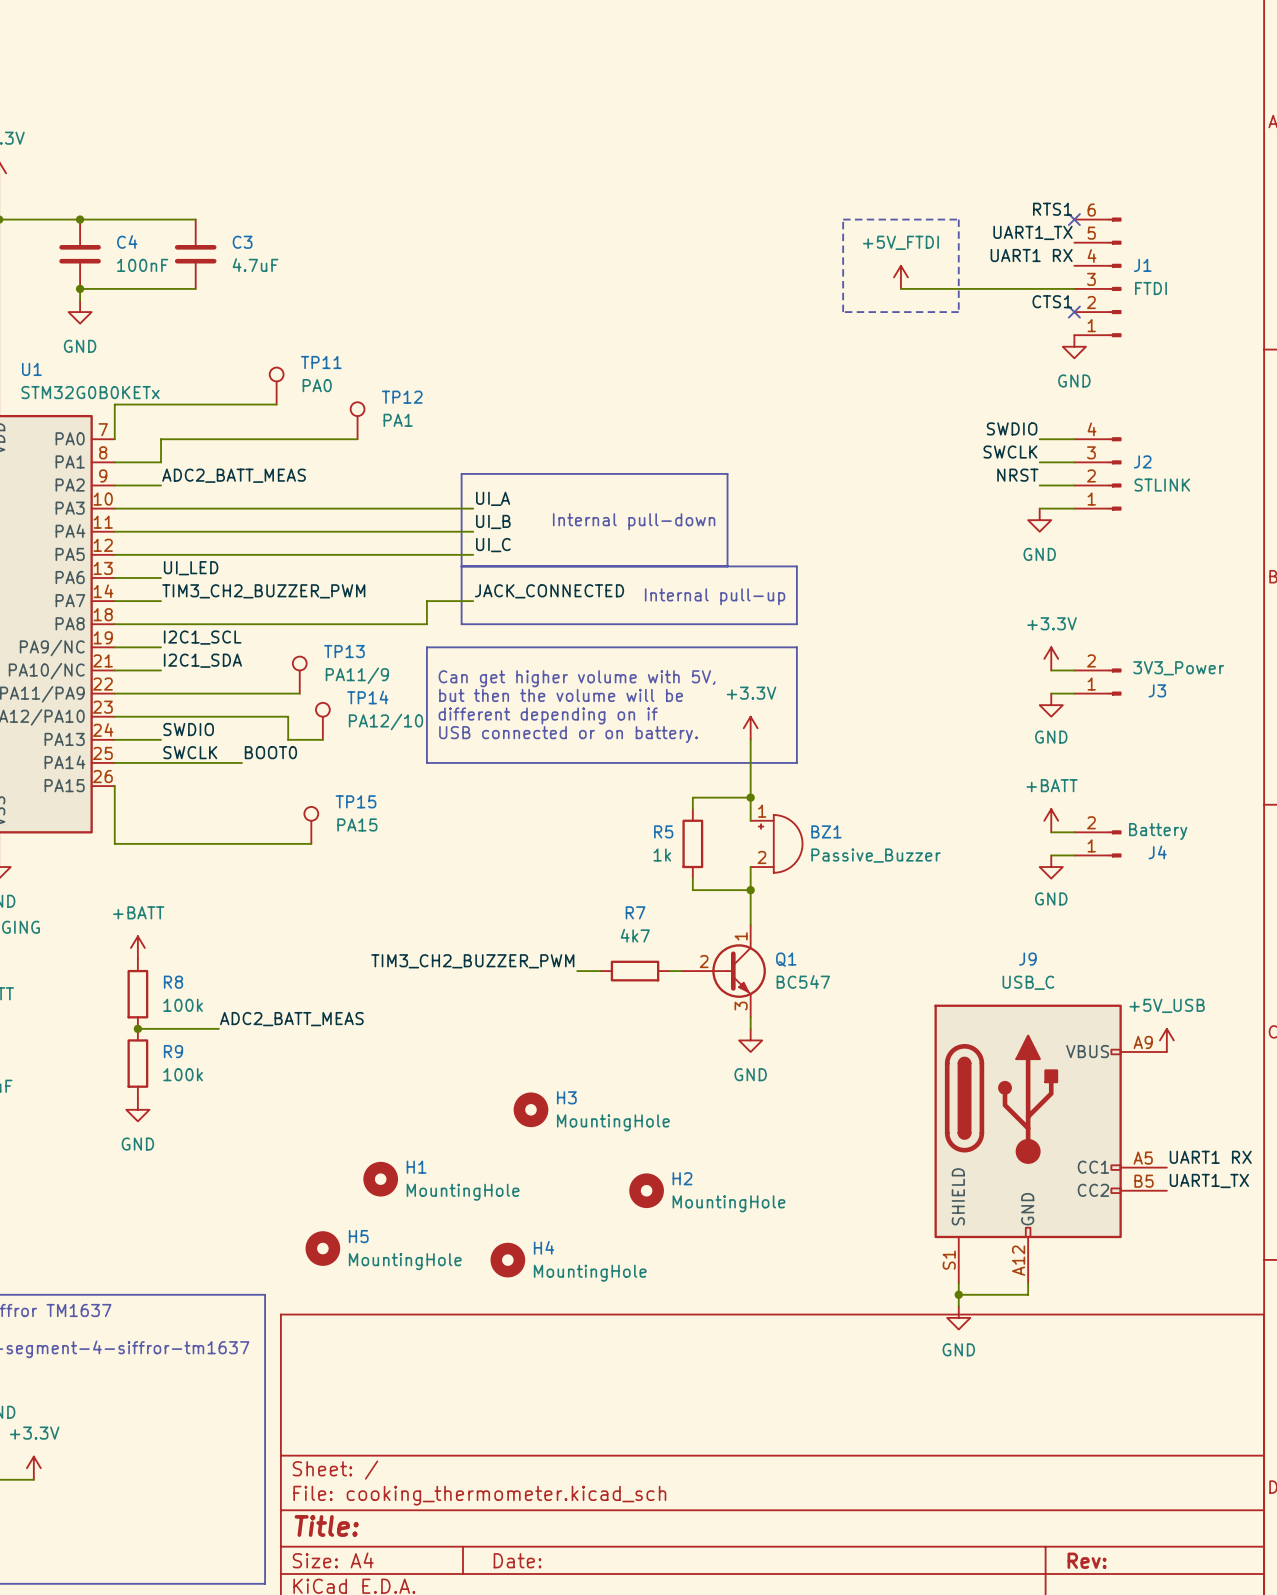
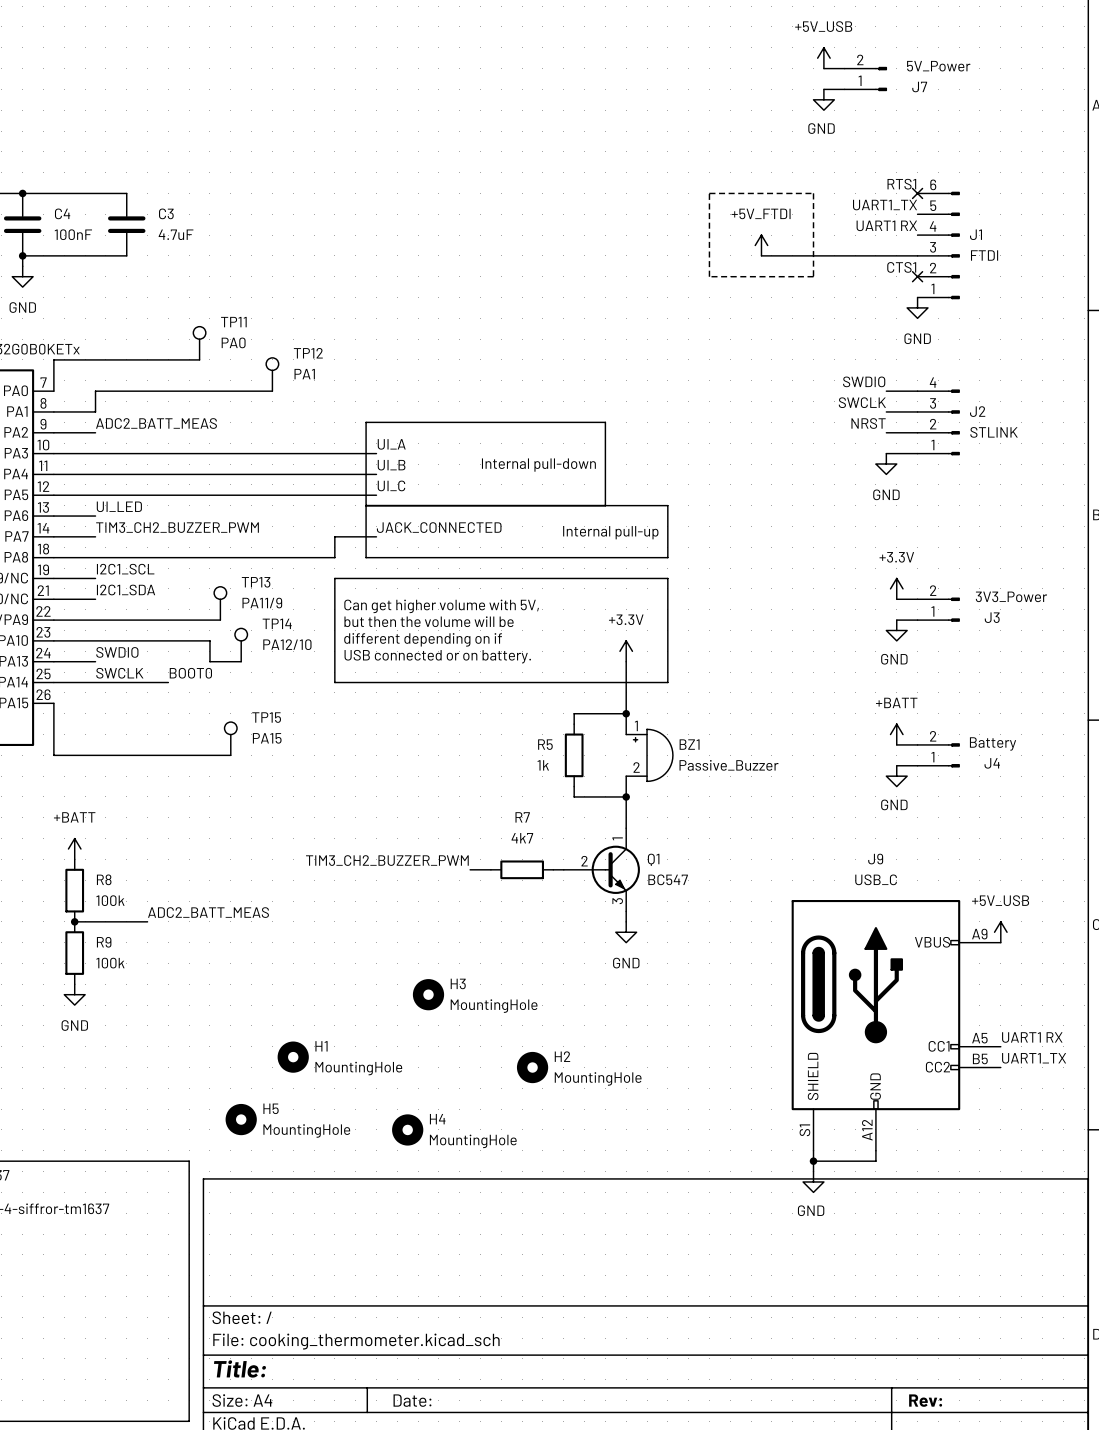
power symbol: none -> +5V_USB (823, 58)
wire: none -> (823, 68) (844, 68)
J7: none -> 5V_Power (865, 79)
wire: none -> (823, 89) (844, 89)
power symbol: none -> GND (823, 99)

